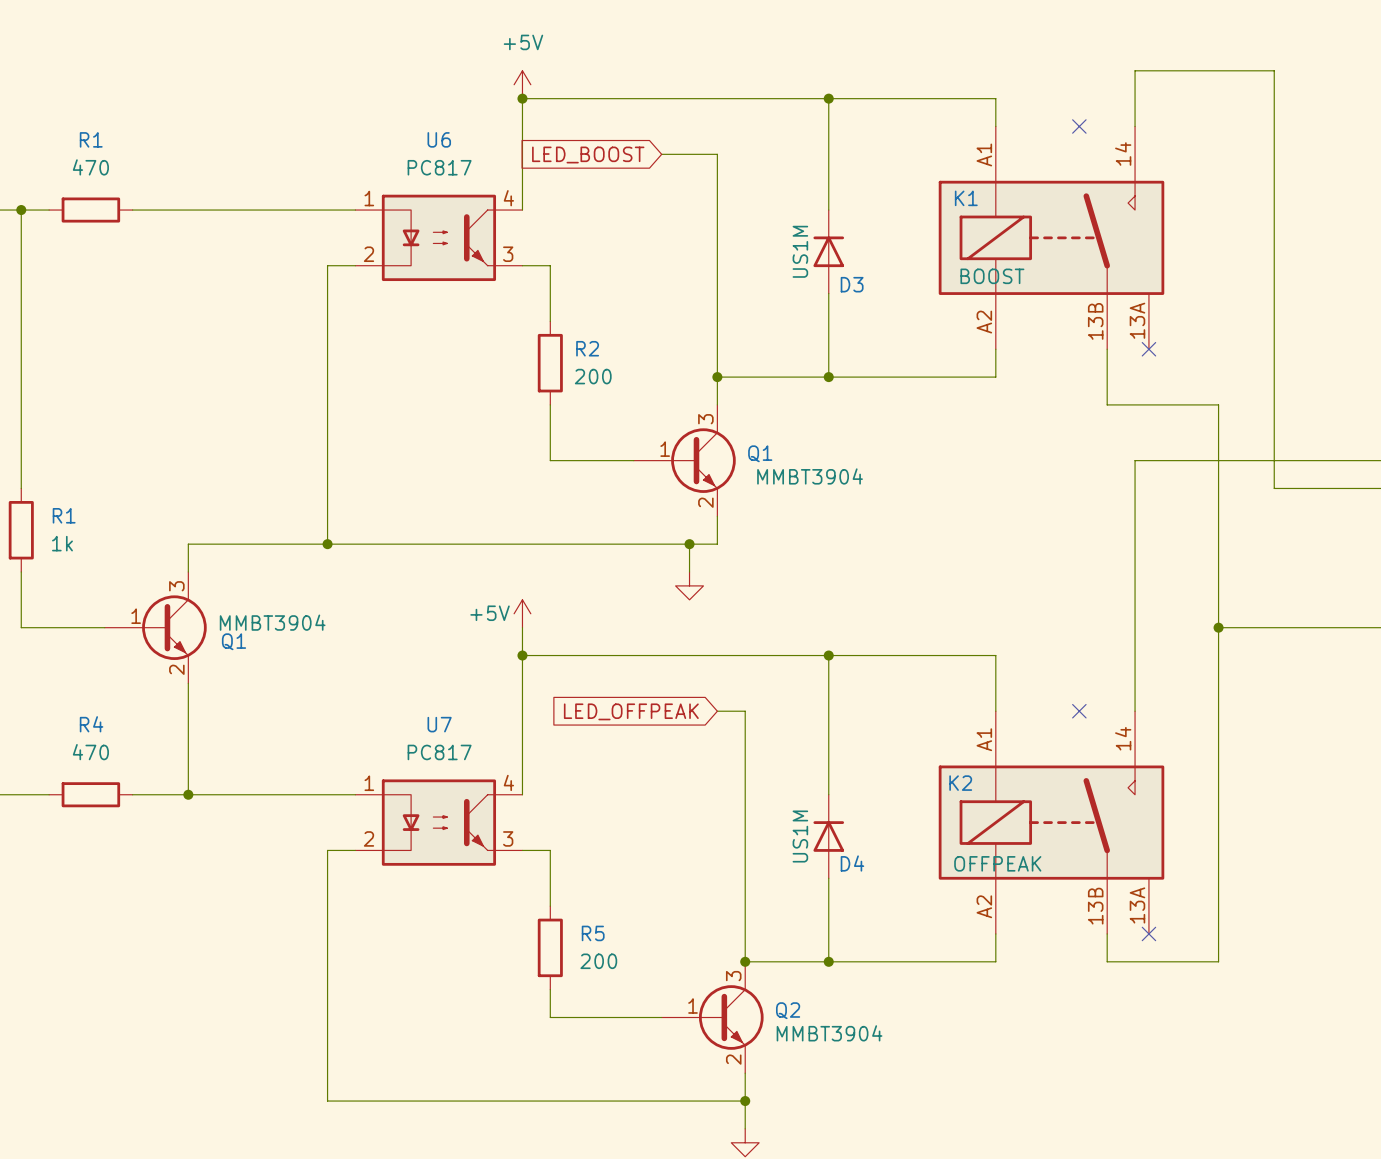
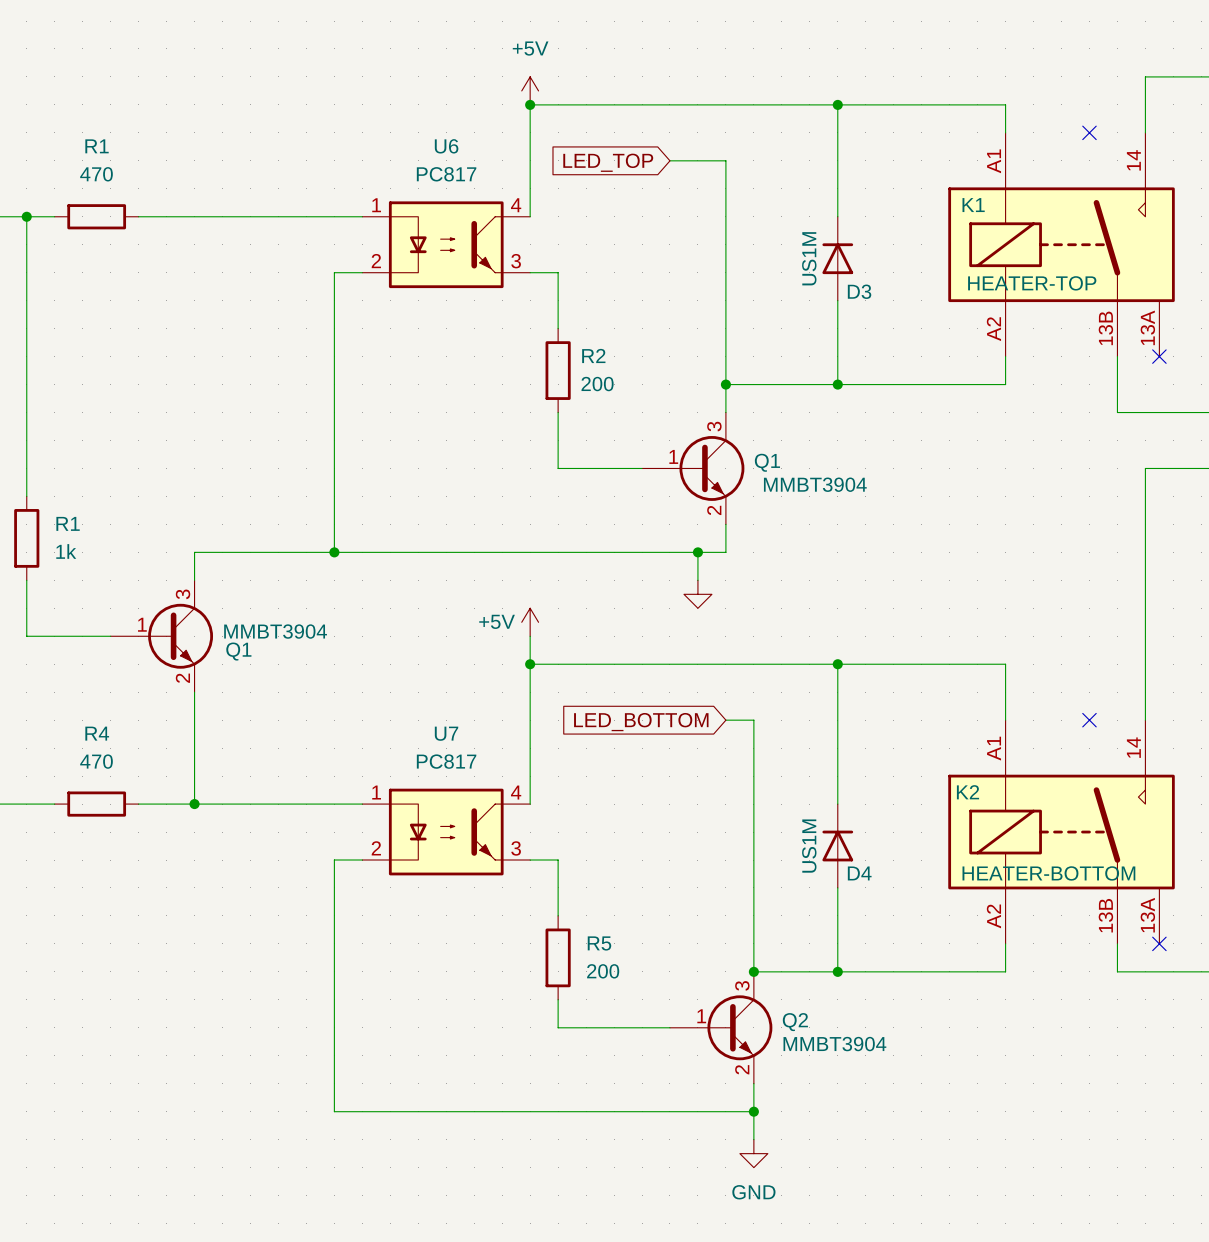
global label: LED_BOOST (588, 155) -> LED_TOP (608, 162)
K1 value: BOOST (992, 276) -> HEATER-TOP (1032, 283)
global label: LED_OFFPEAK (631, 711) -> LED_BOTTOM (641, 722)
K2 value: OFFPEAK (997, 863) -> HEATER-BOTTOM (1048, 873)

